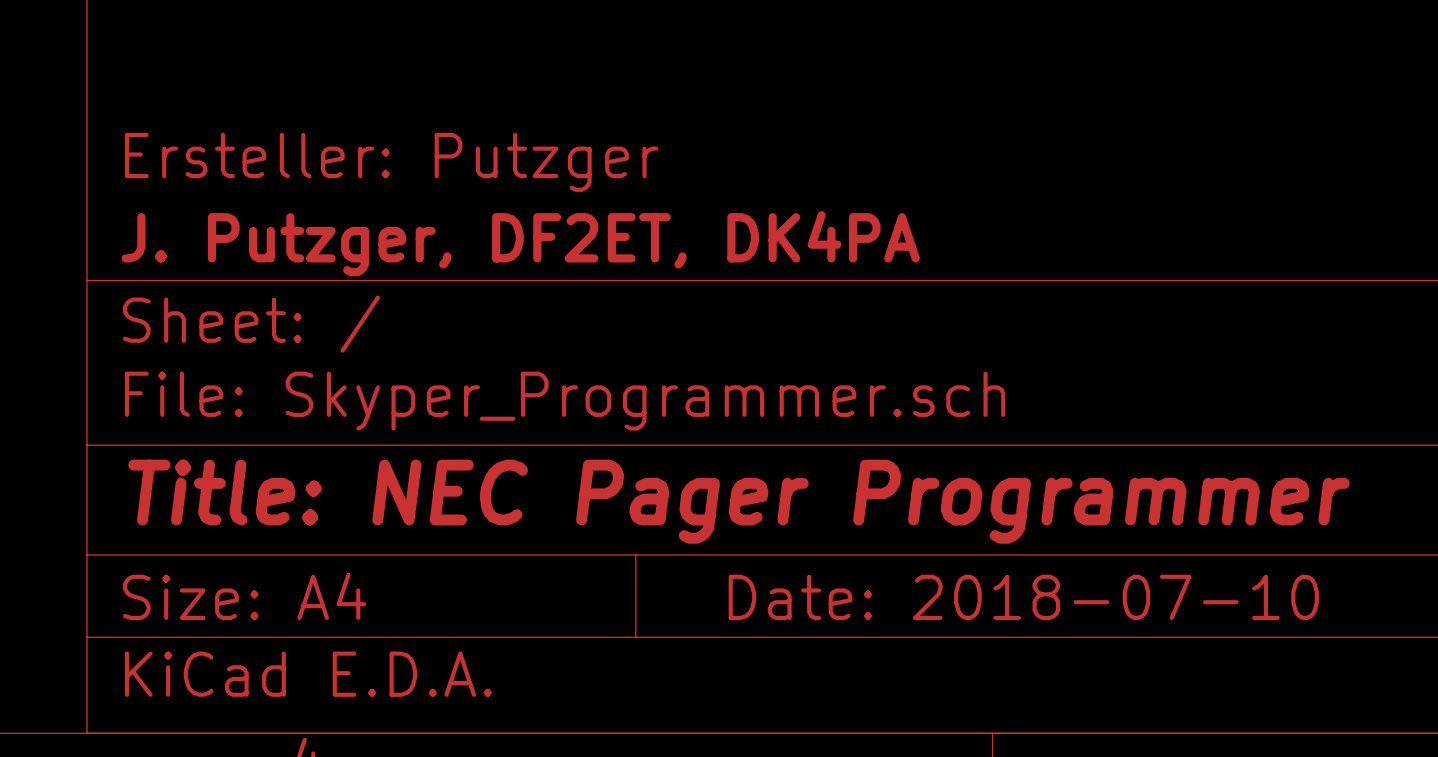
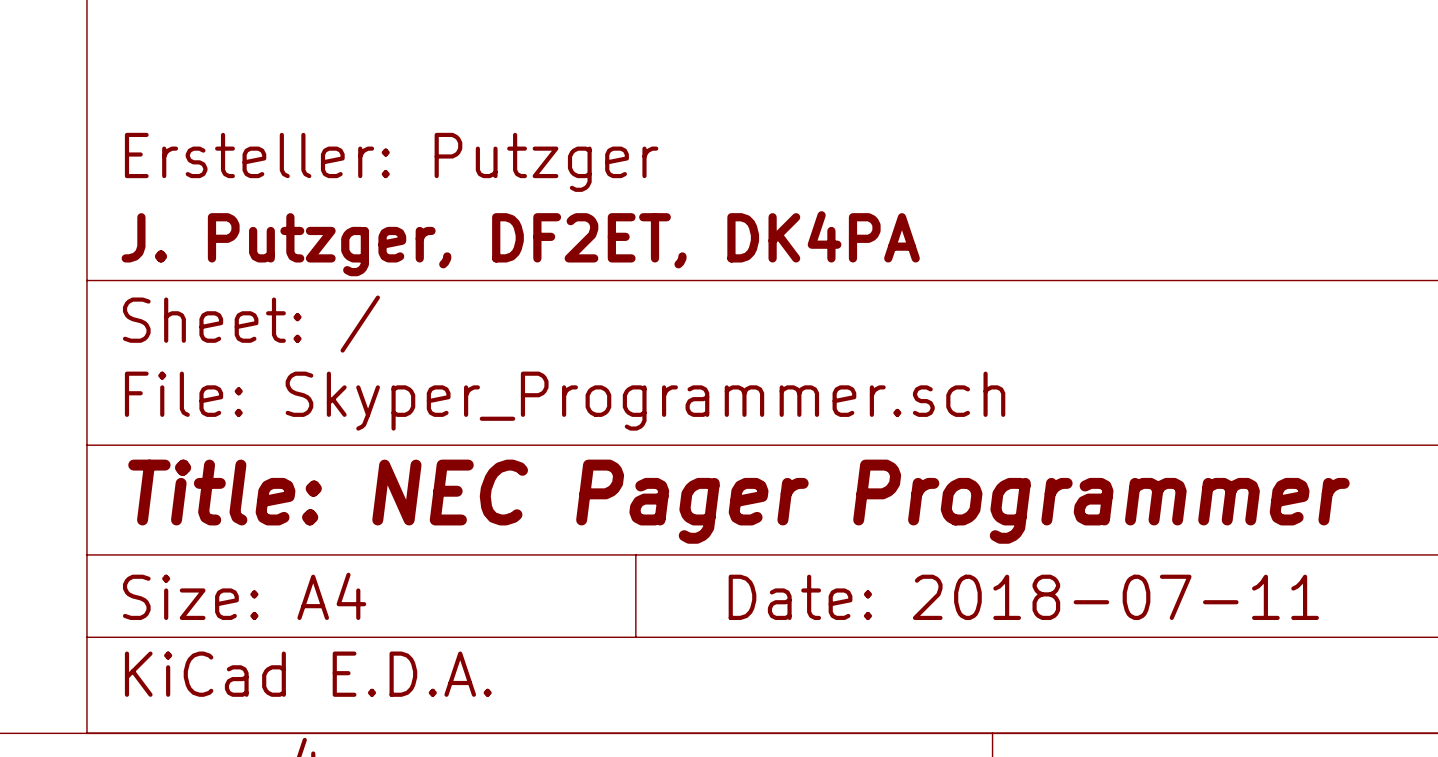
title block: Date: 2018-07-10 (1023, 597) -> Date: 2018-07-11 (1023, 597)

